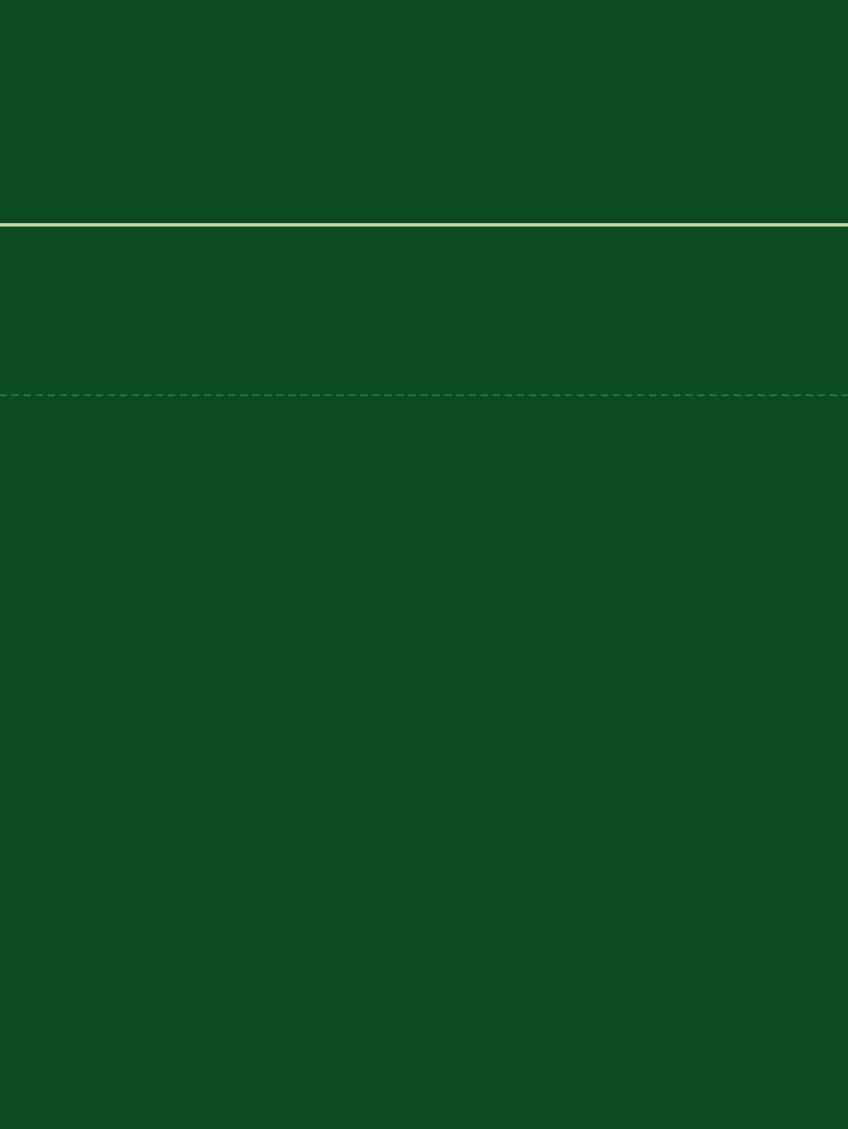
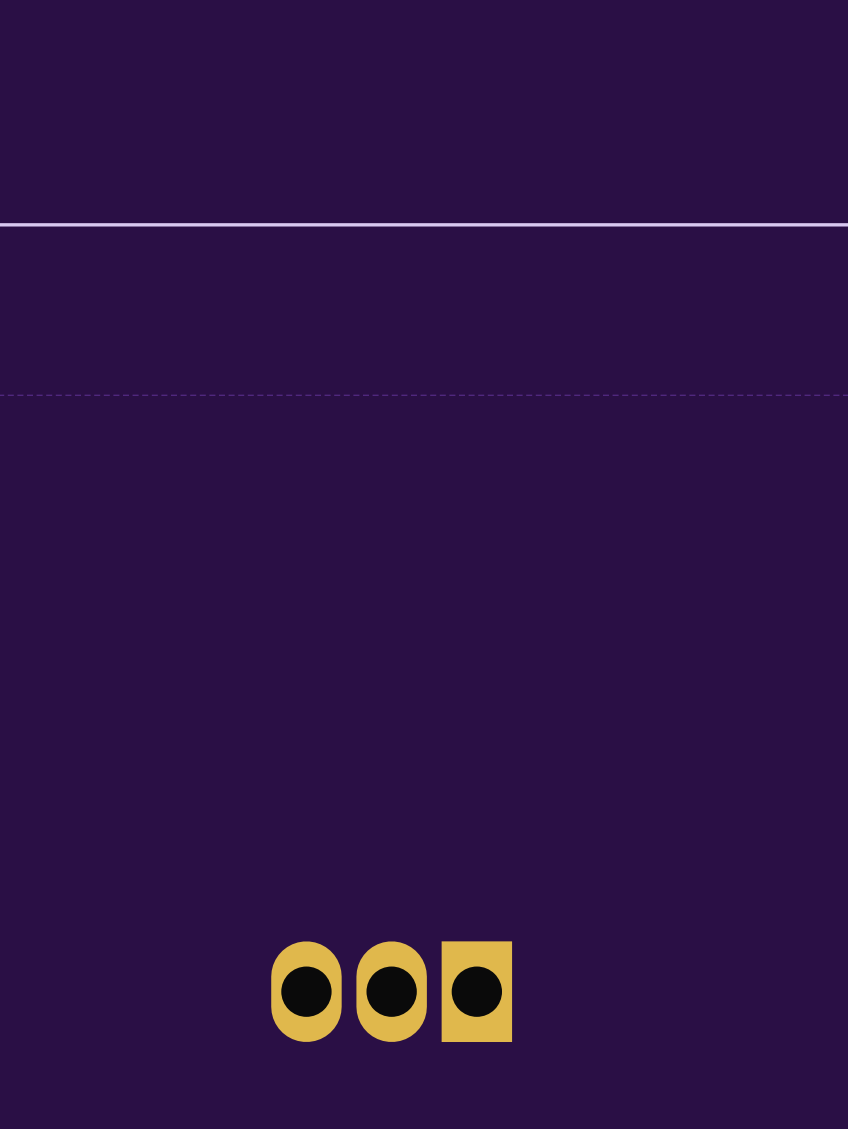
part: none -> (391, 991)

